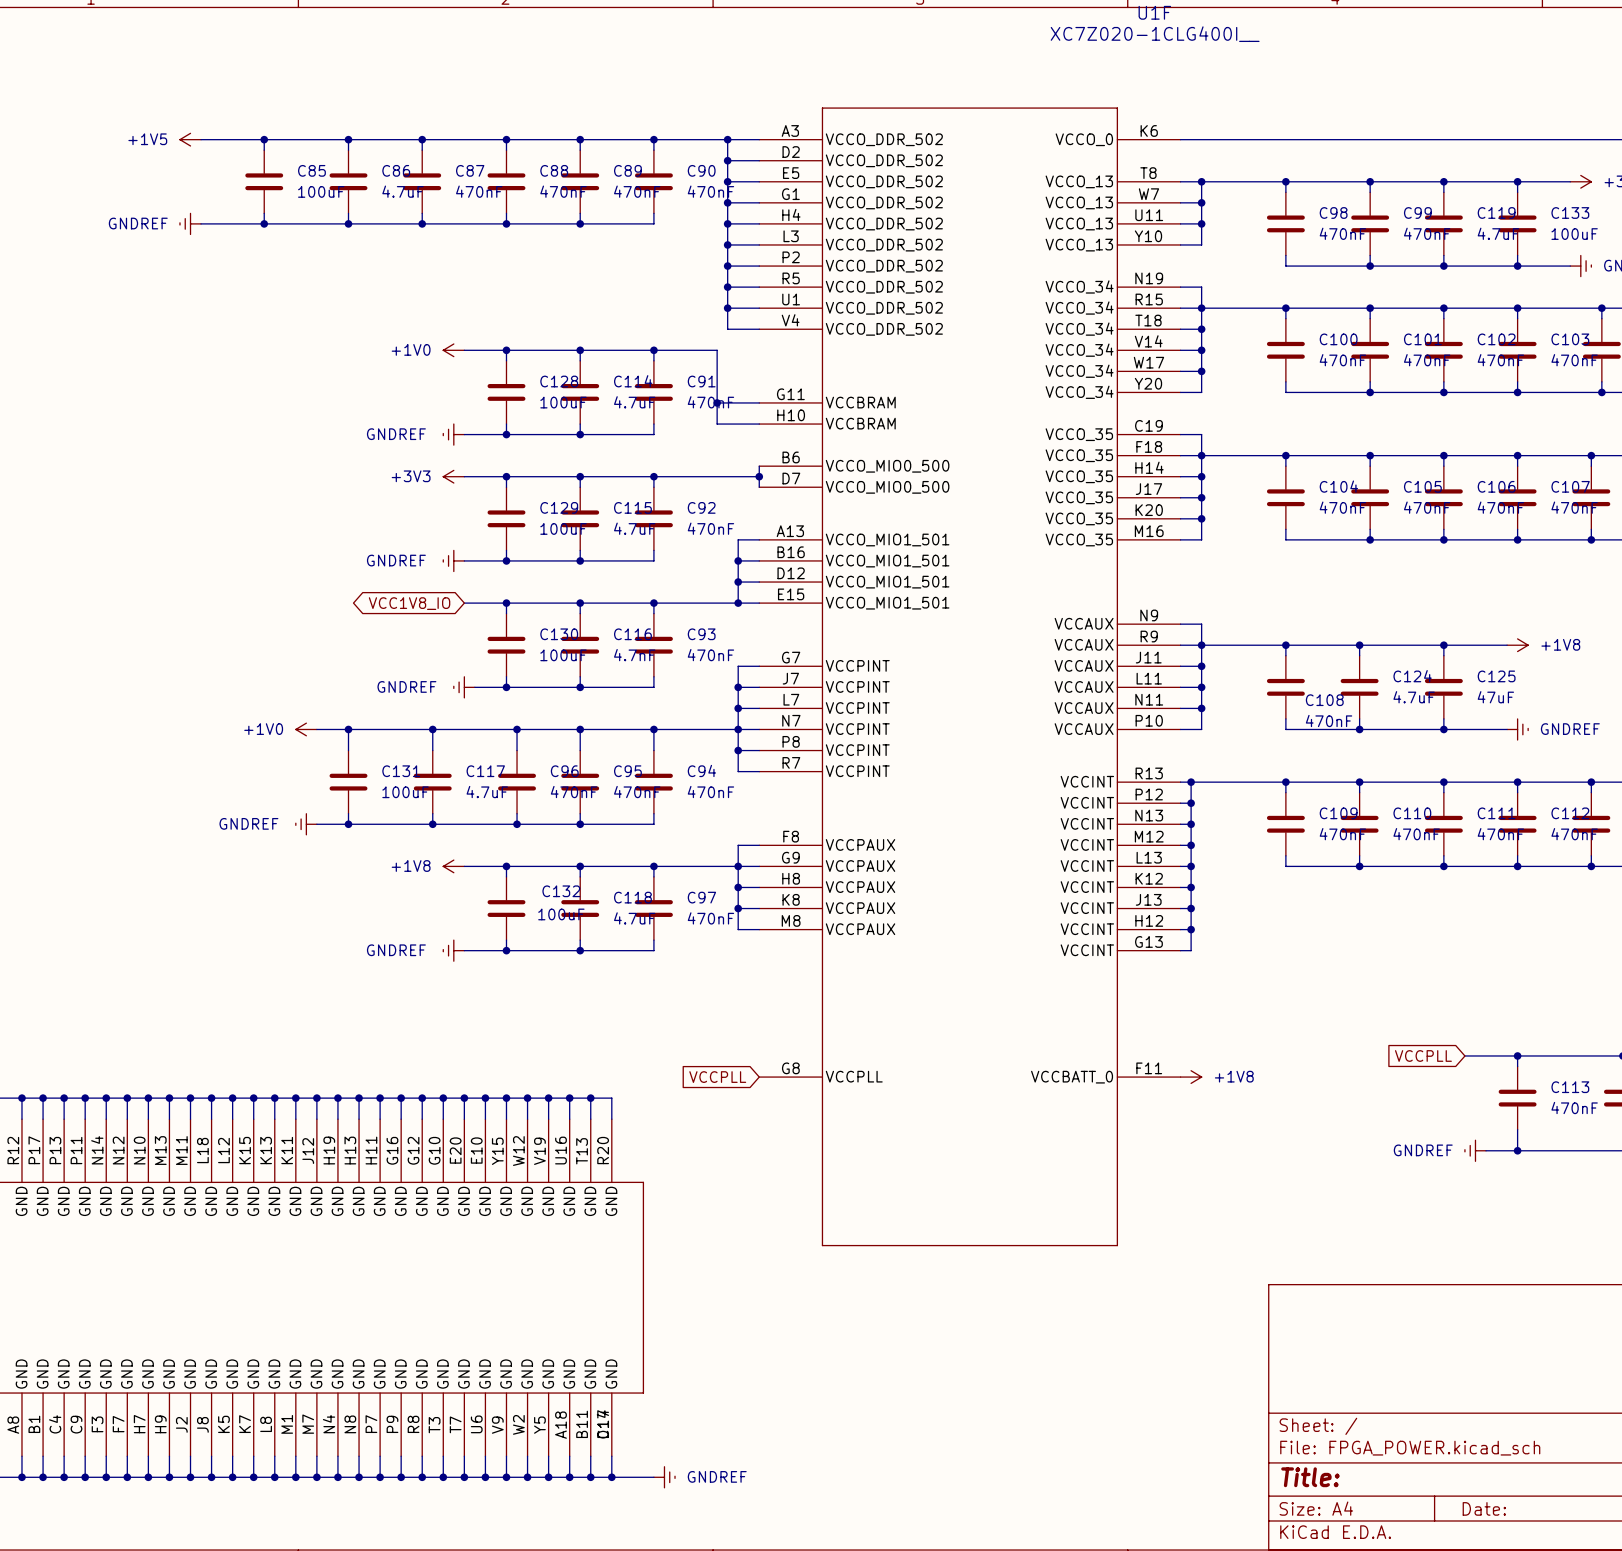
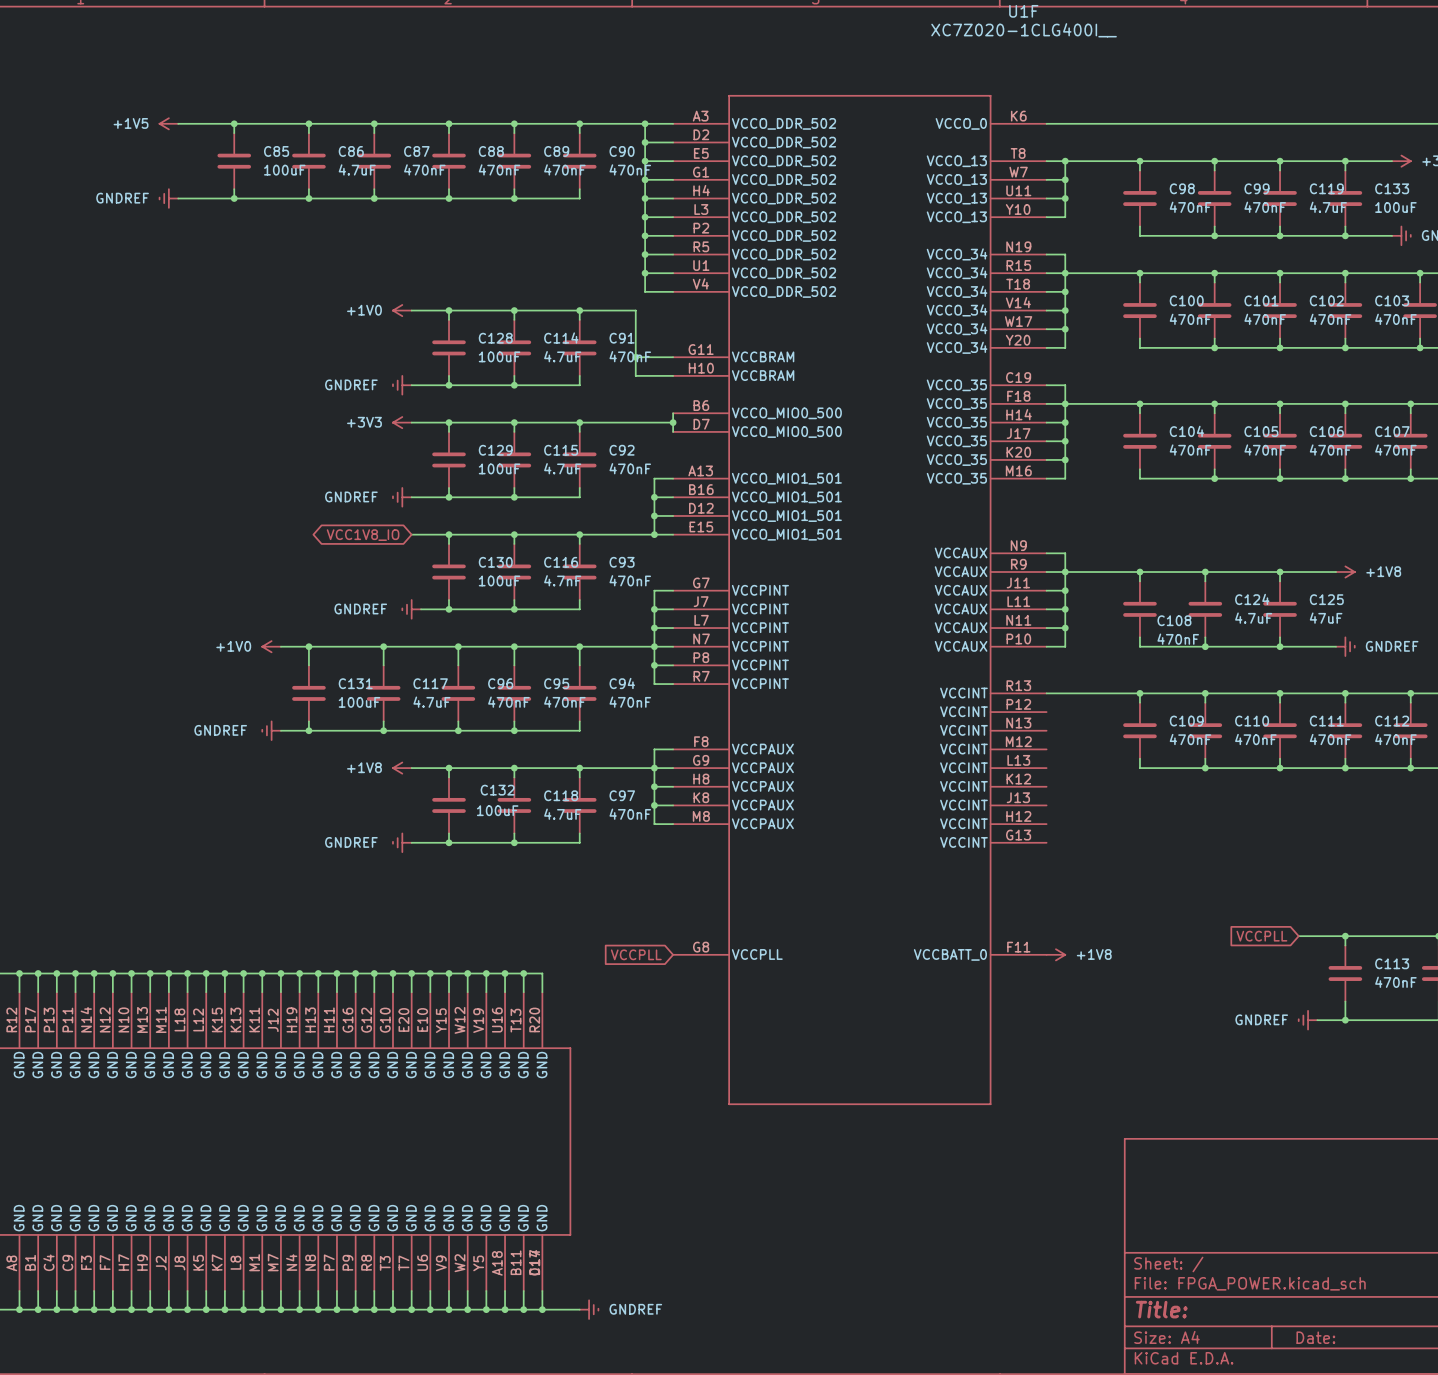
wire: (1191, 782) (1191, 950) (1180, 950) -> none
junction: (1191, 782) -> none
wire: (1180, 803) (1191, 803) -> none
junction: (1191, 803) -> none
wire: (1180, 824) (1191, 824) -> none
junction: (1191, 824) -> none
wire: (1180, 845) (1191, 845) -> none
junction: (1191, 845) -> none
wire: (1180, 866) (1191, 866) -> none
junction: (1191, 866) -> none
wire: (1180, 887) (1191, 887) -> none
junction: (1191, 887) -> none
wire: (1180, 908) (1191, 908) -> none
junction: (1191, 908) -> none
wire: (1180, 929) (1191, 929) -> none
junction: (1191, 929) -> none

